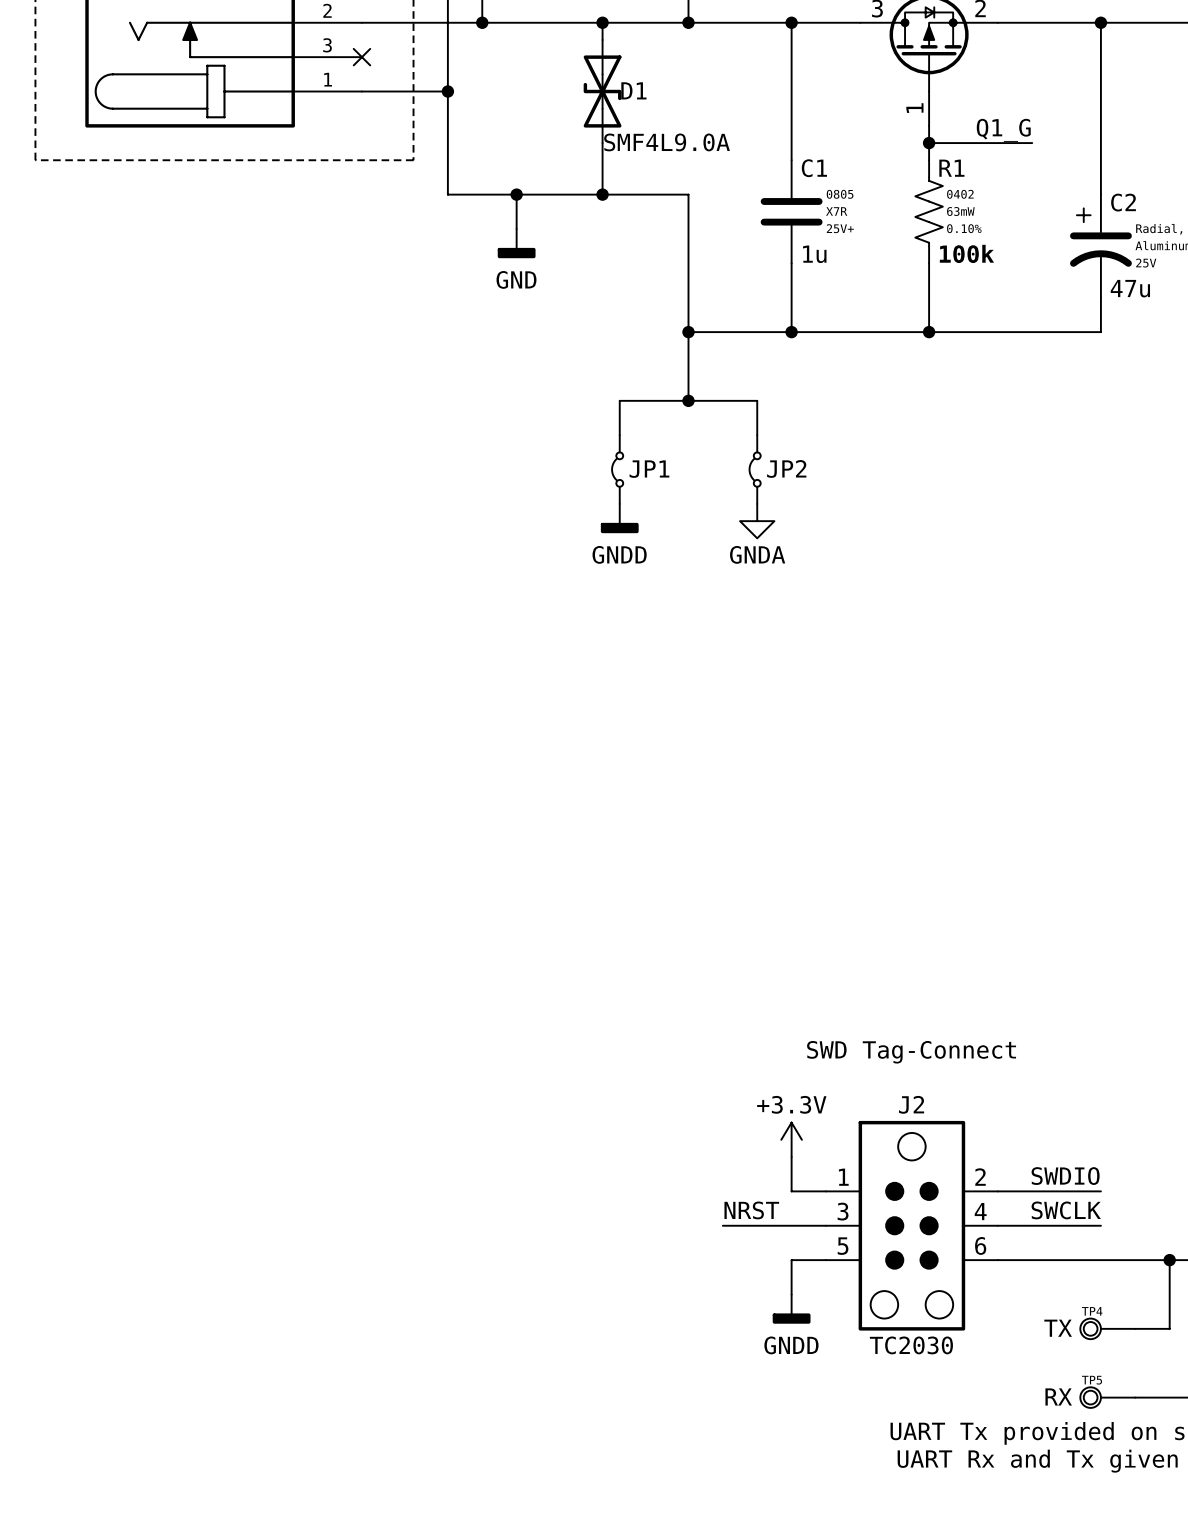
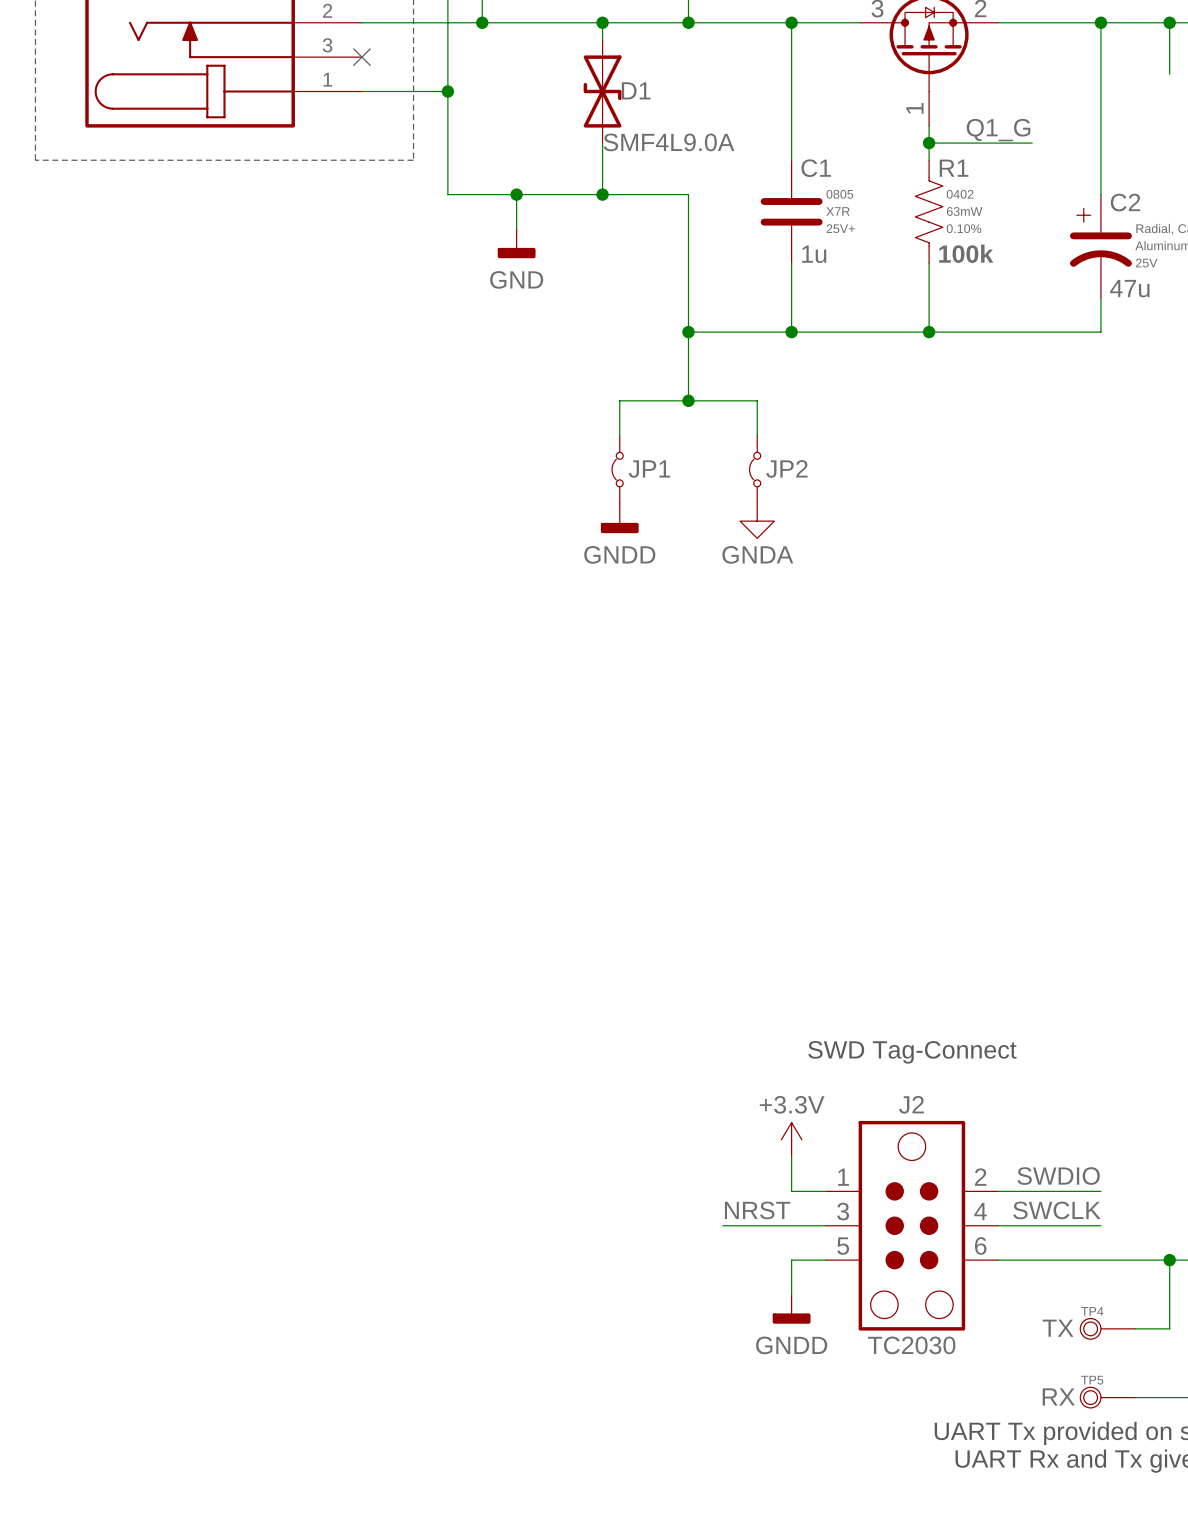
wire: none -> (1169, 22) (1169, 74)
junction: none -> (1169, 22)

